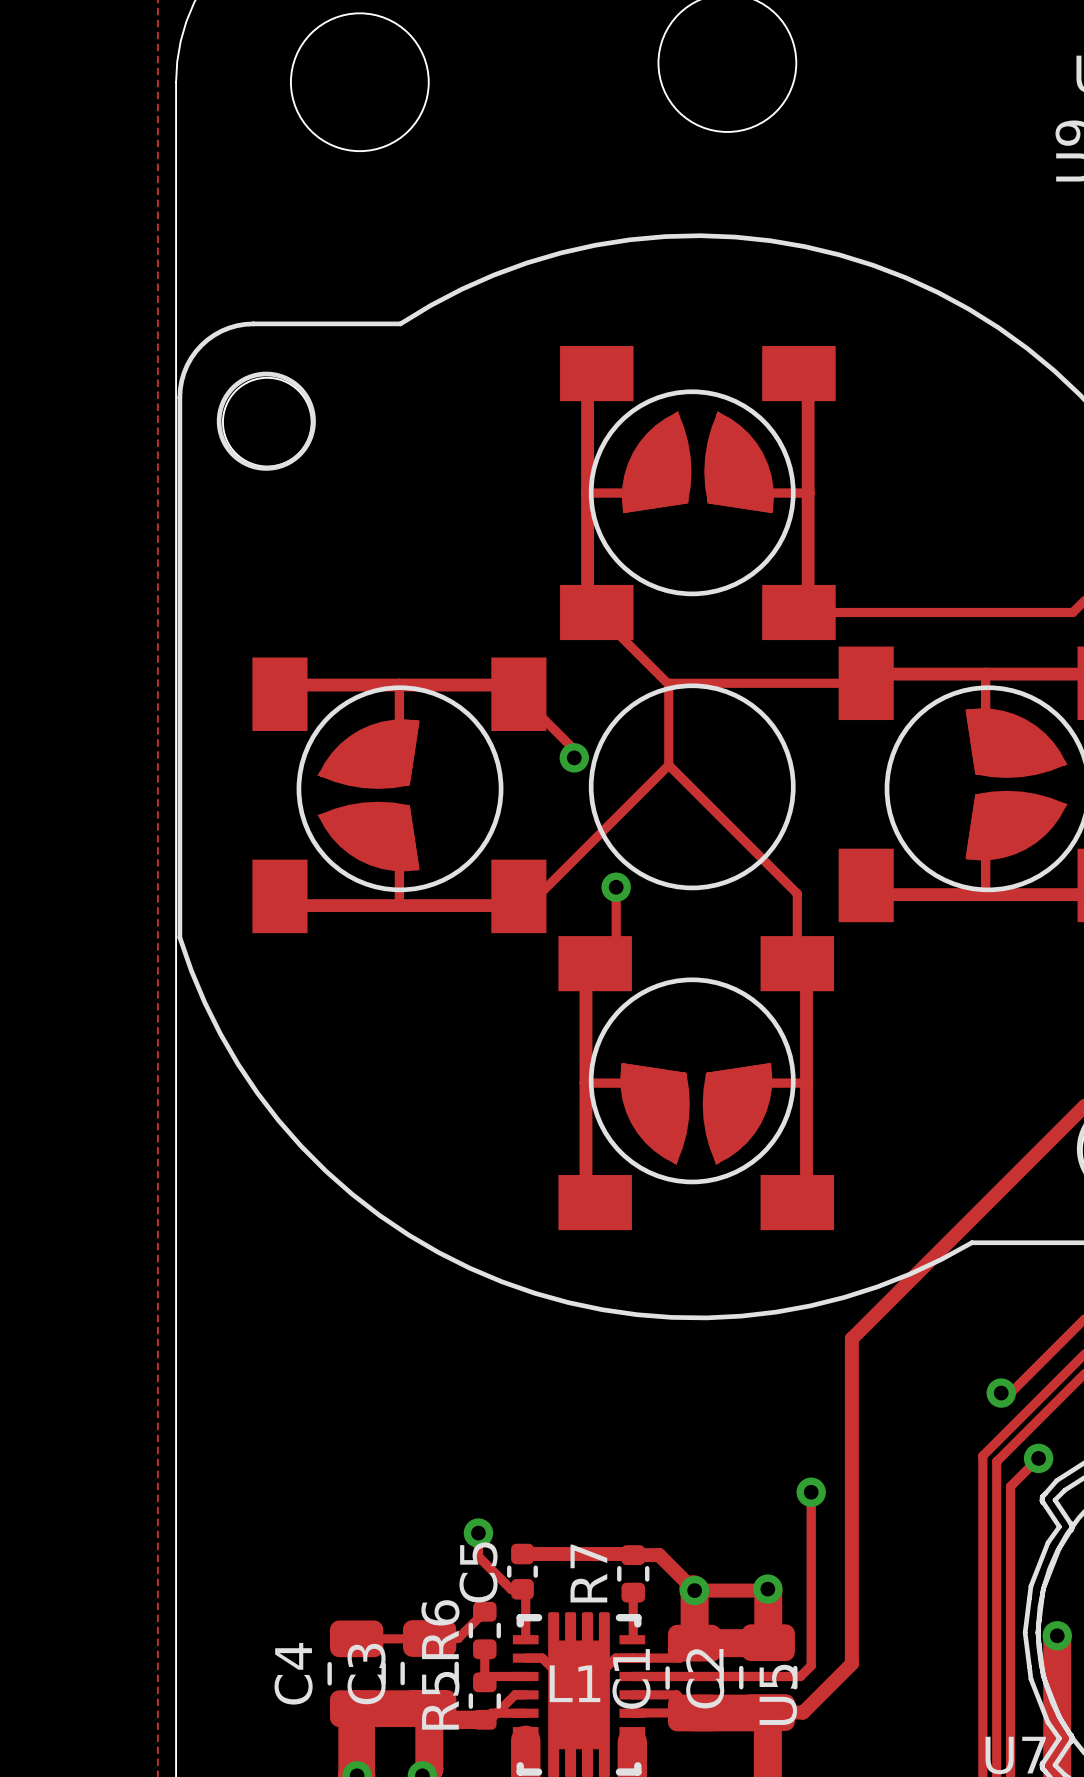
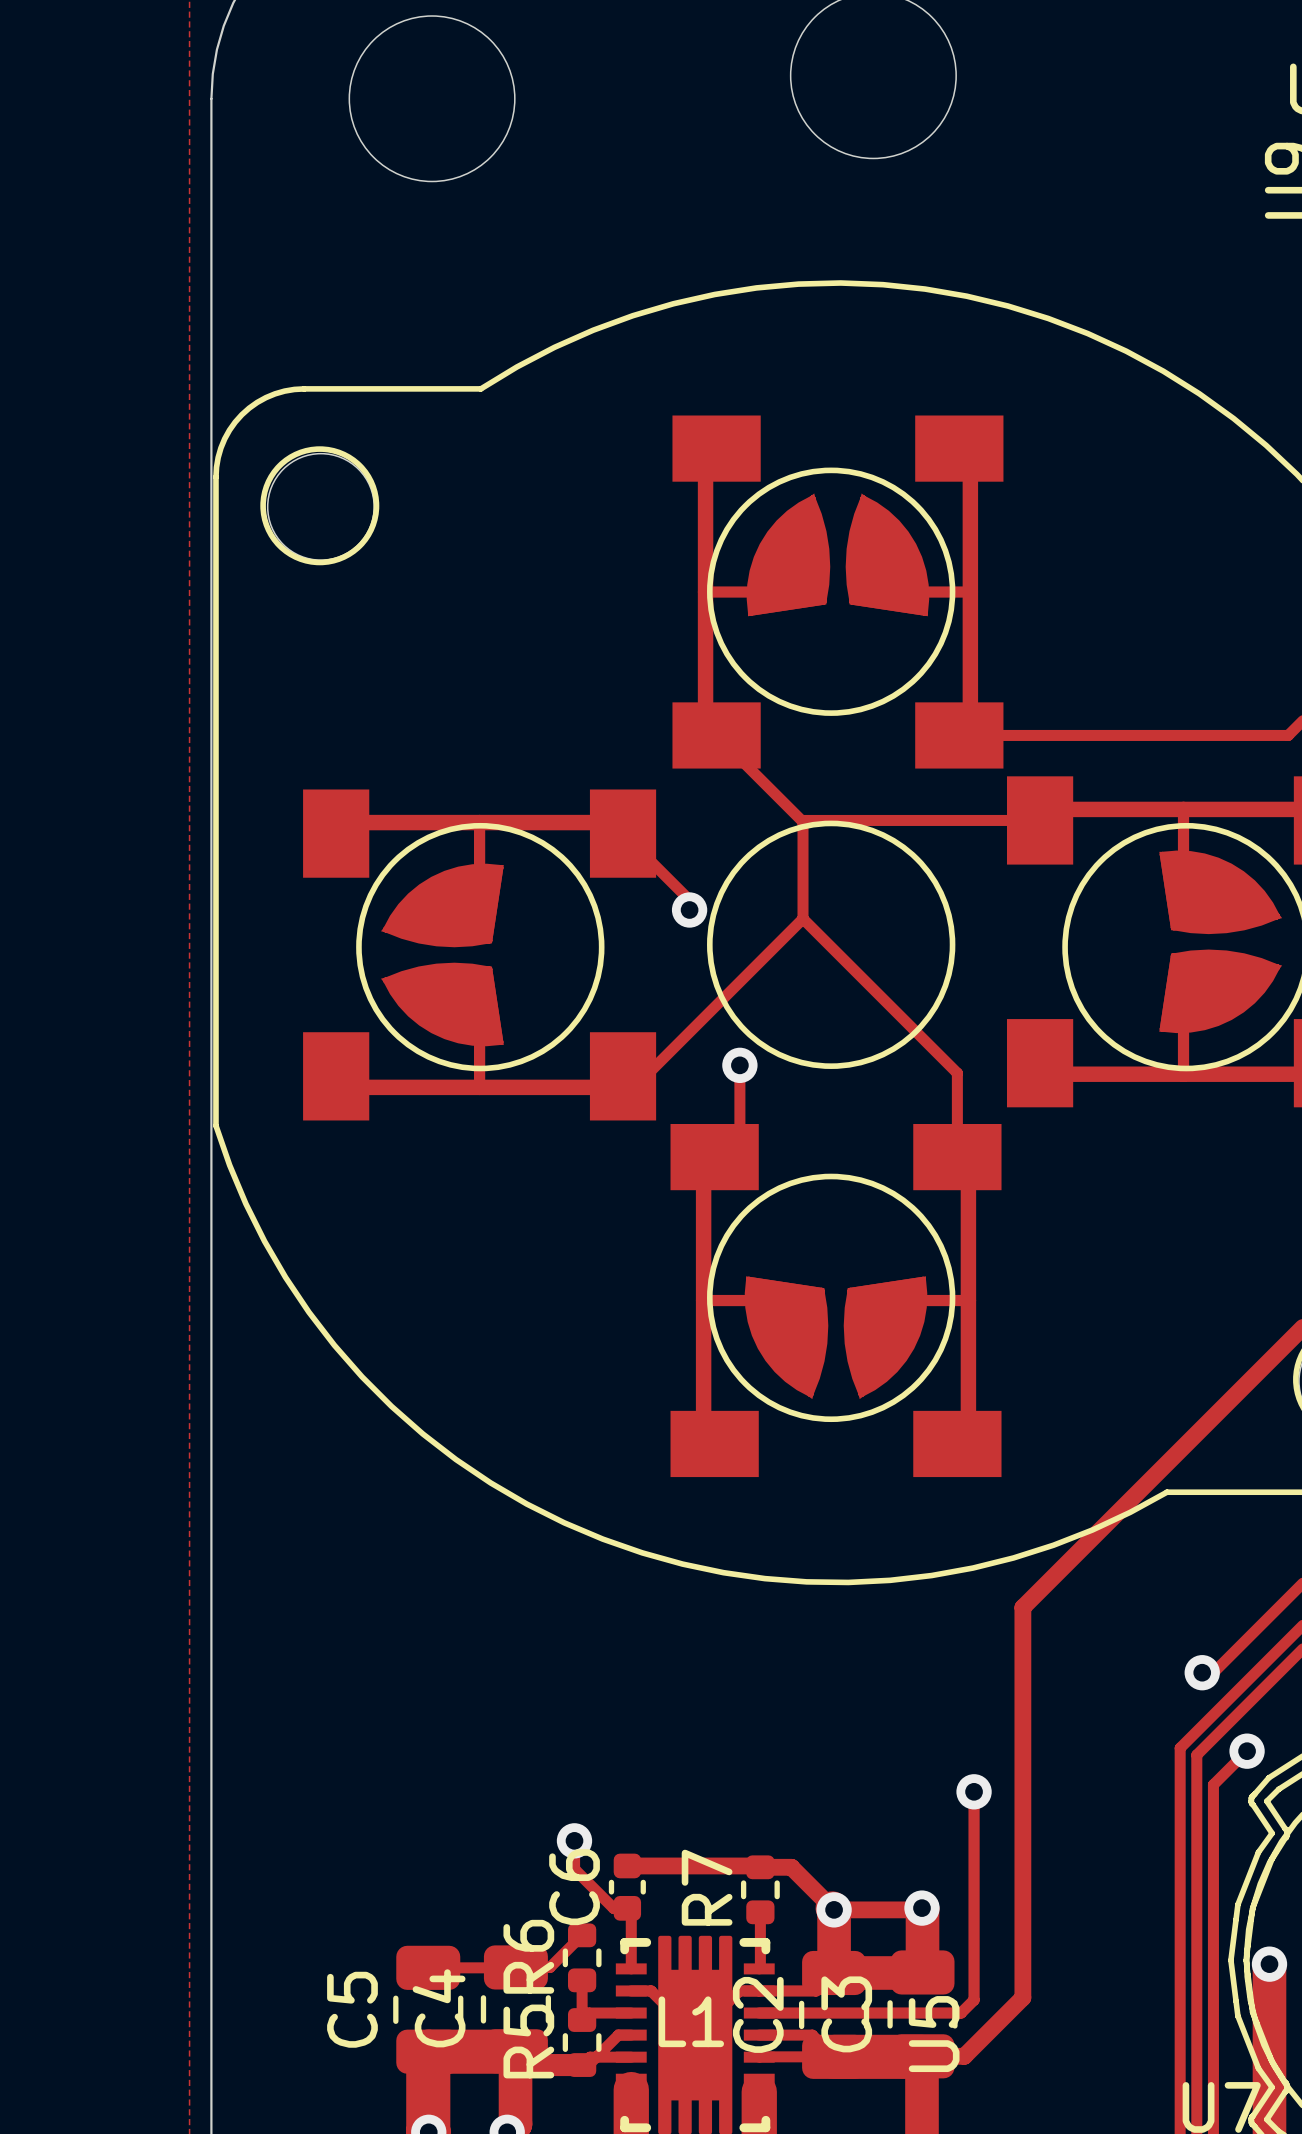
C5 name: C5 (478, 1572) -> C6 (574, 1887)
C4 name: C4 (293, 1673) -> C5 (352, 2009)
C3 name: C3 (366, 1674) -> C4 (439, 2008)
C1 name: C1 (631, 1678) -> C2 (758, 2014)
C2 name: C2 (705, 1678) -> C3 (846, 2014)

